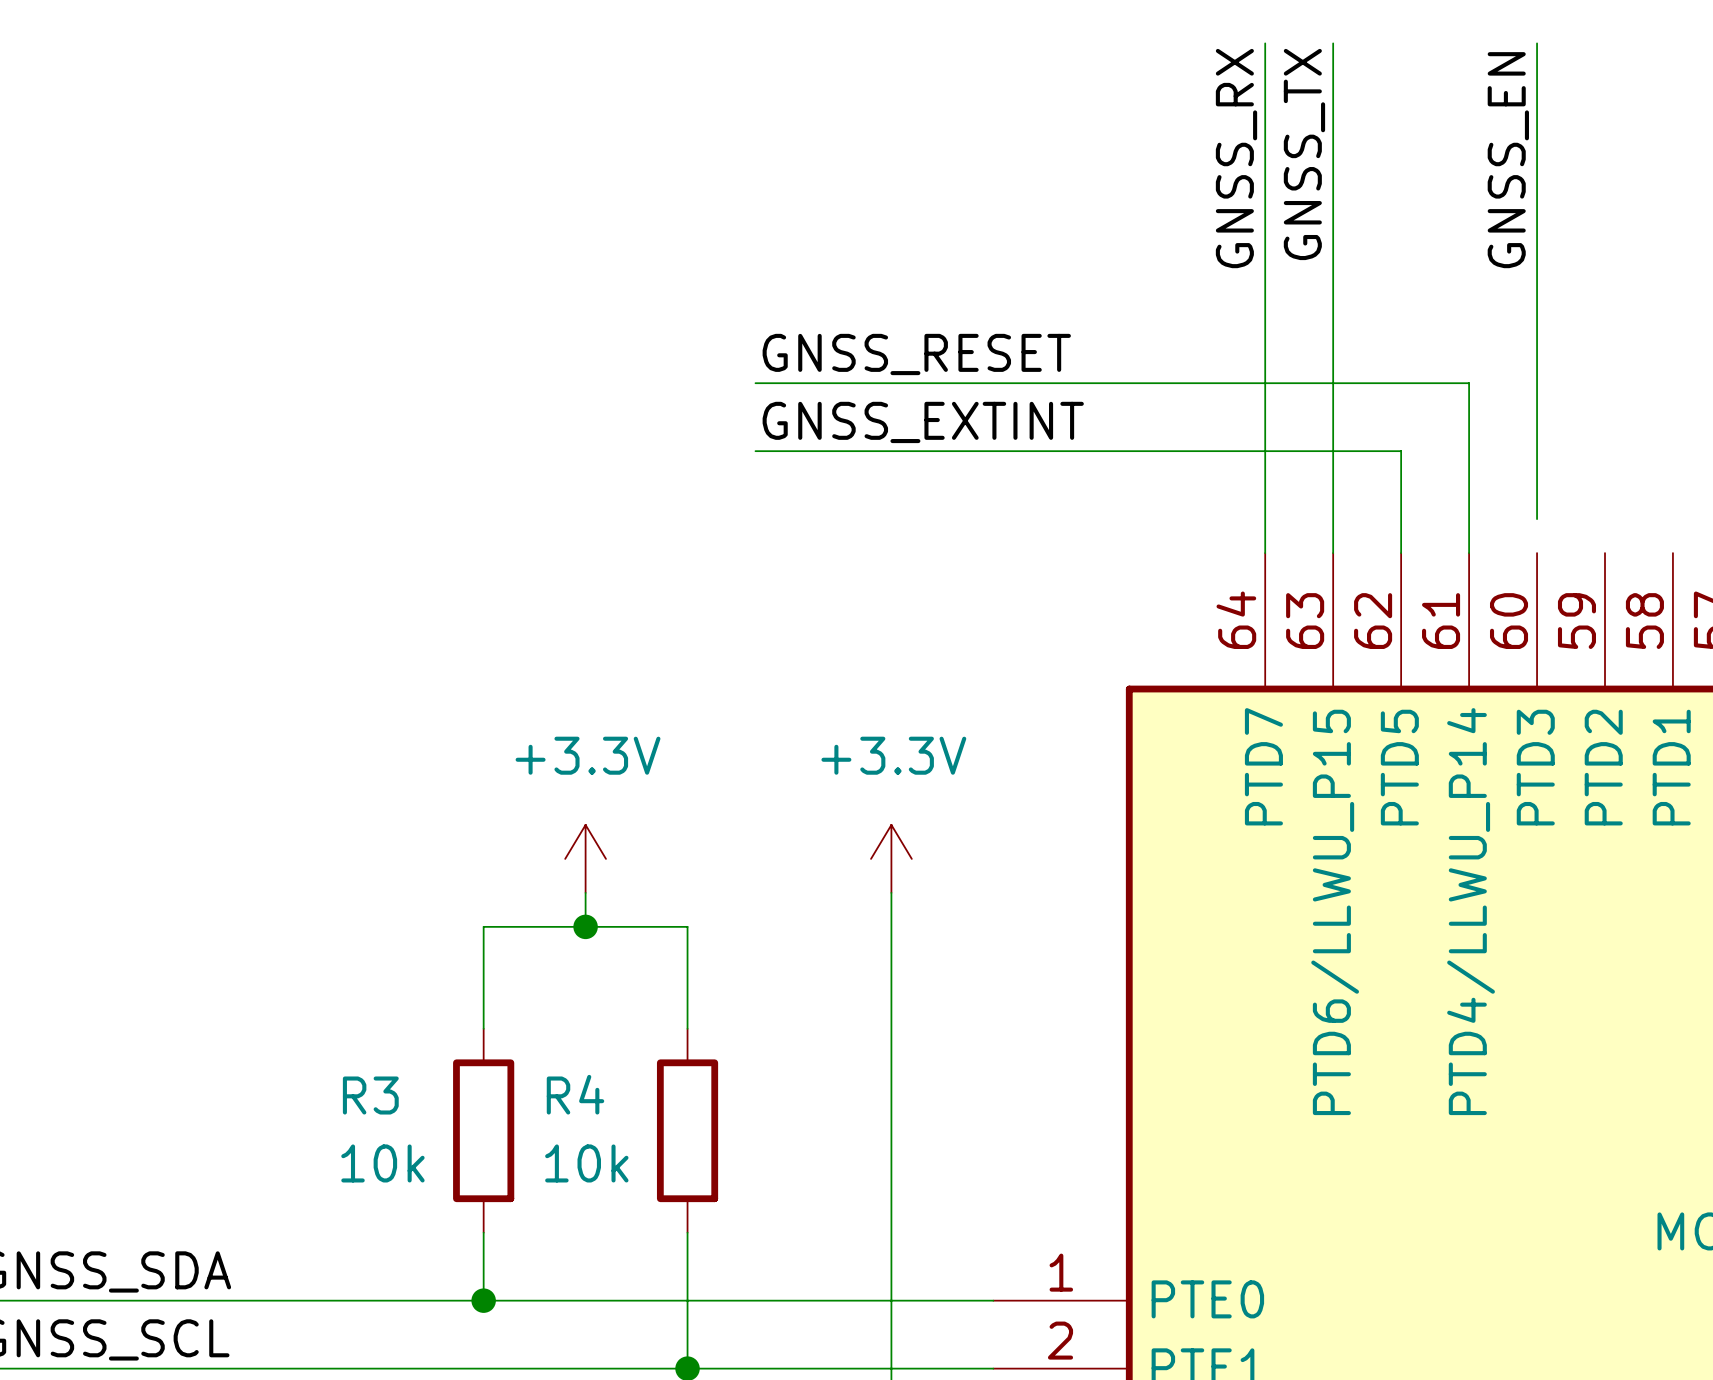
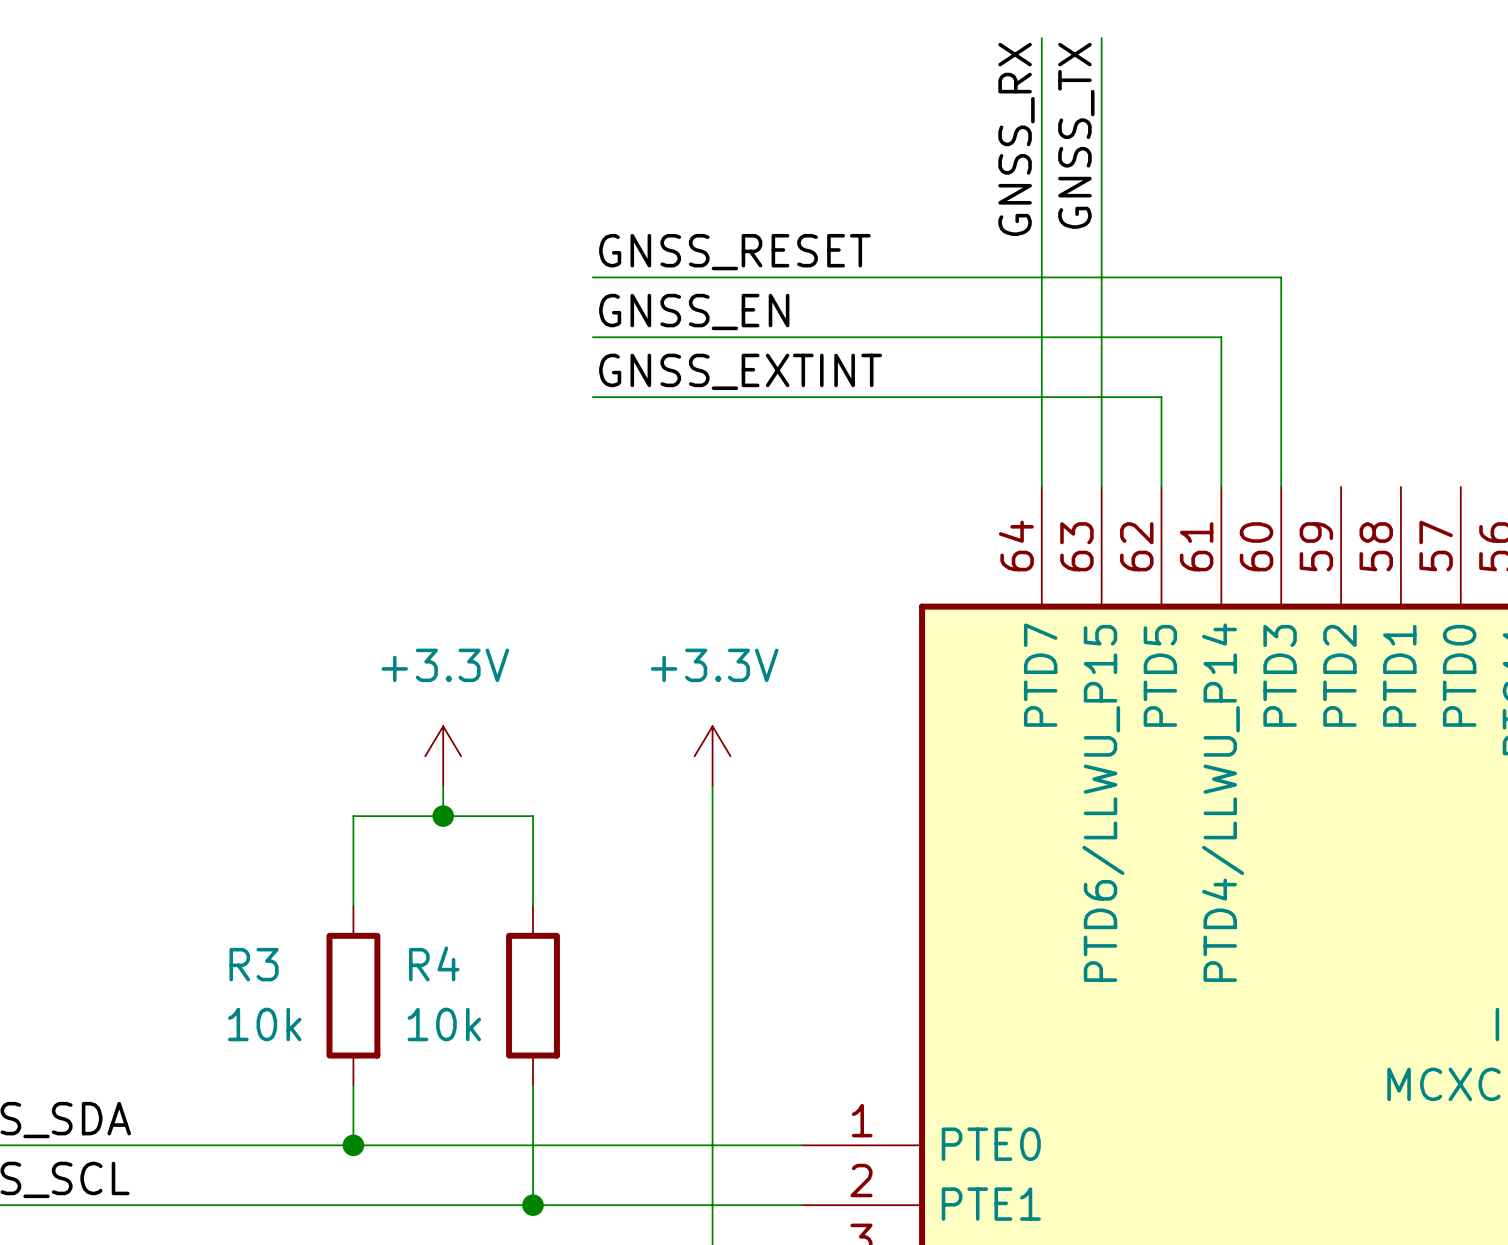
wire: (1537, 43) (1537, 315) -> (592, 277) (1281, 277)
label: GNSS_EN (1508, 160) -> none
label: none -> GNSS_RESET (734, 252)
label: GNSS_RESET (916, 354) -> GNSS_EN (694, 311)
wire: none -> (1281, 456) (1281, 486)

